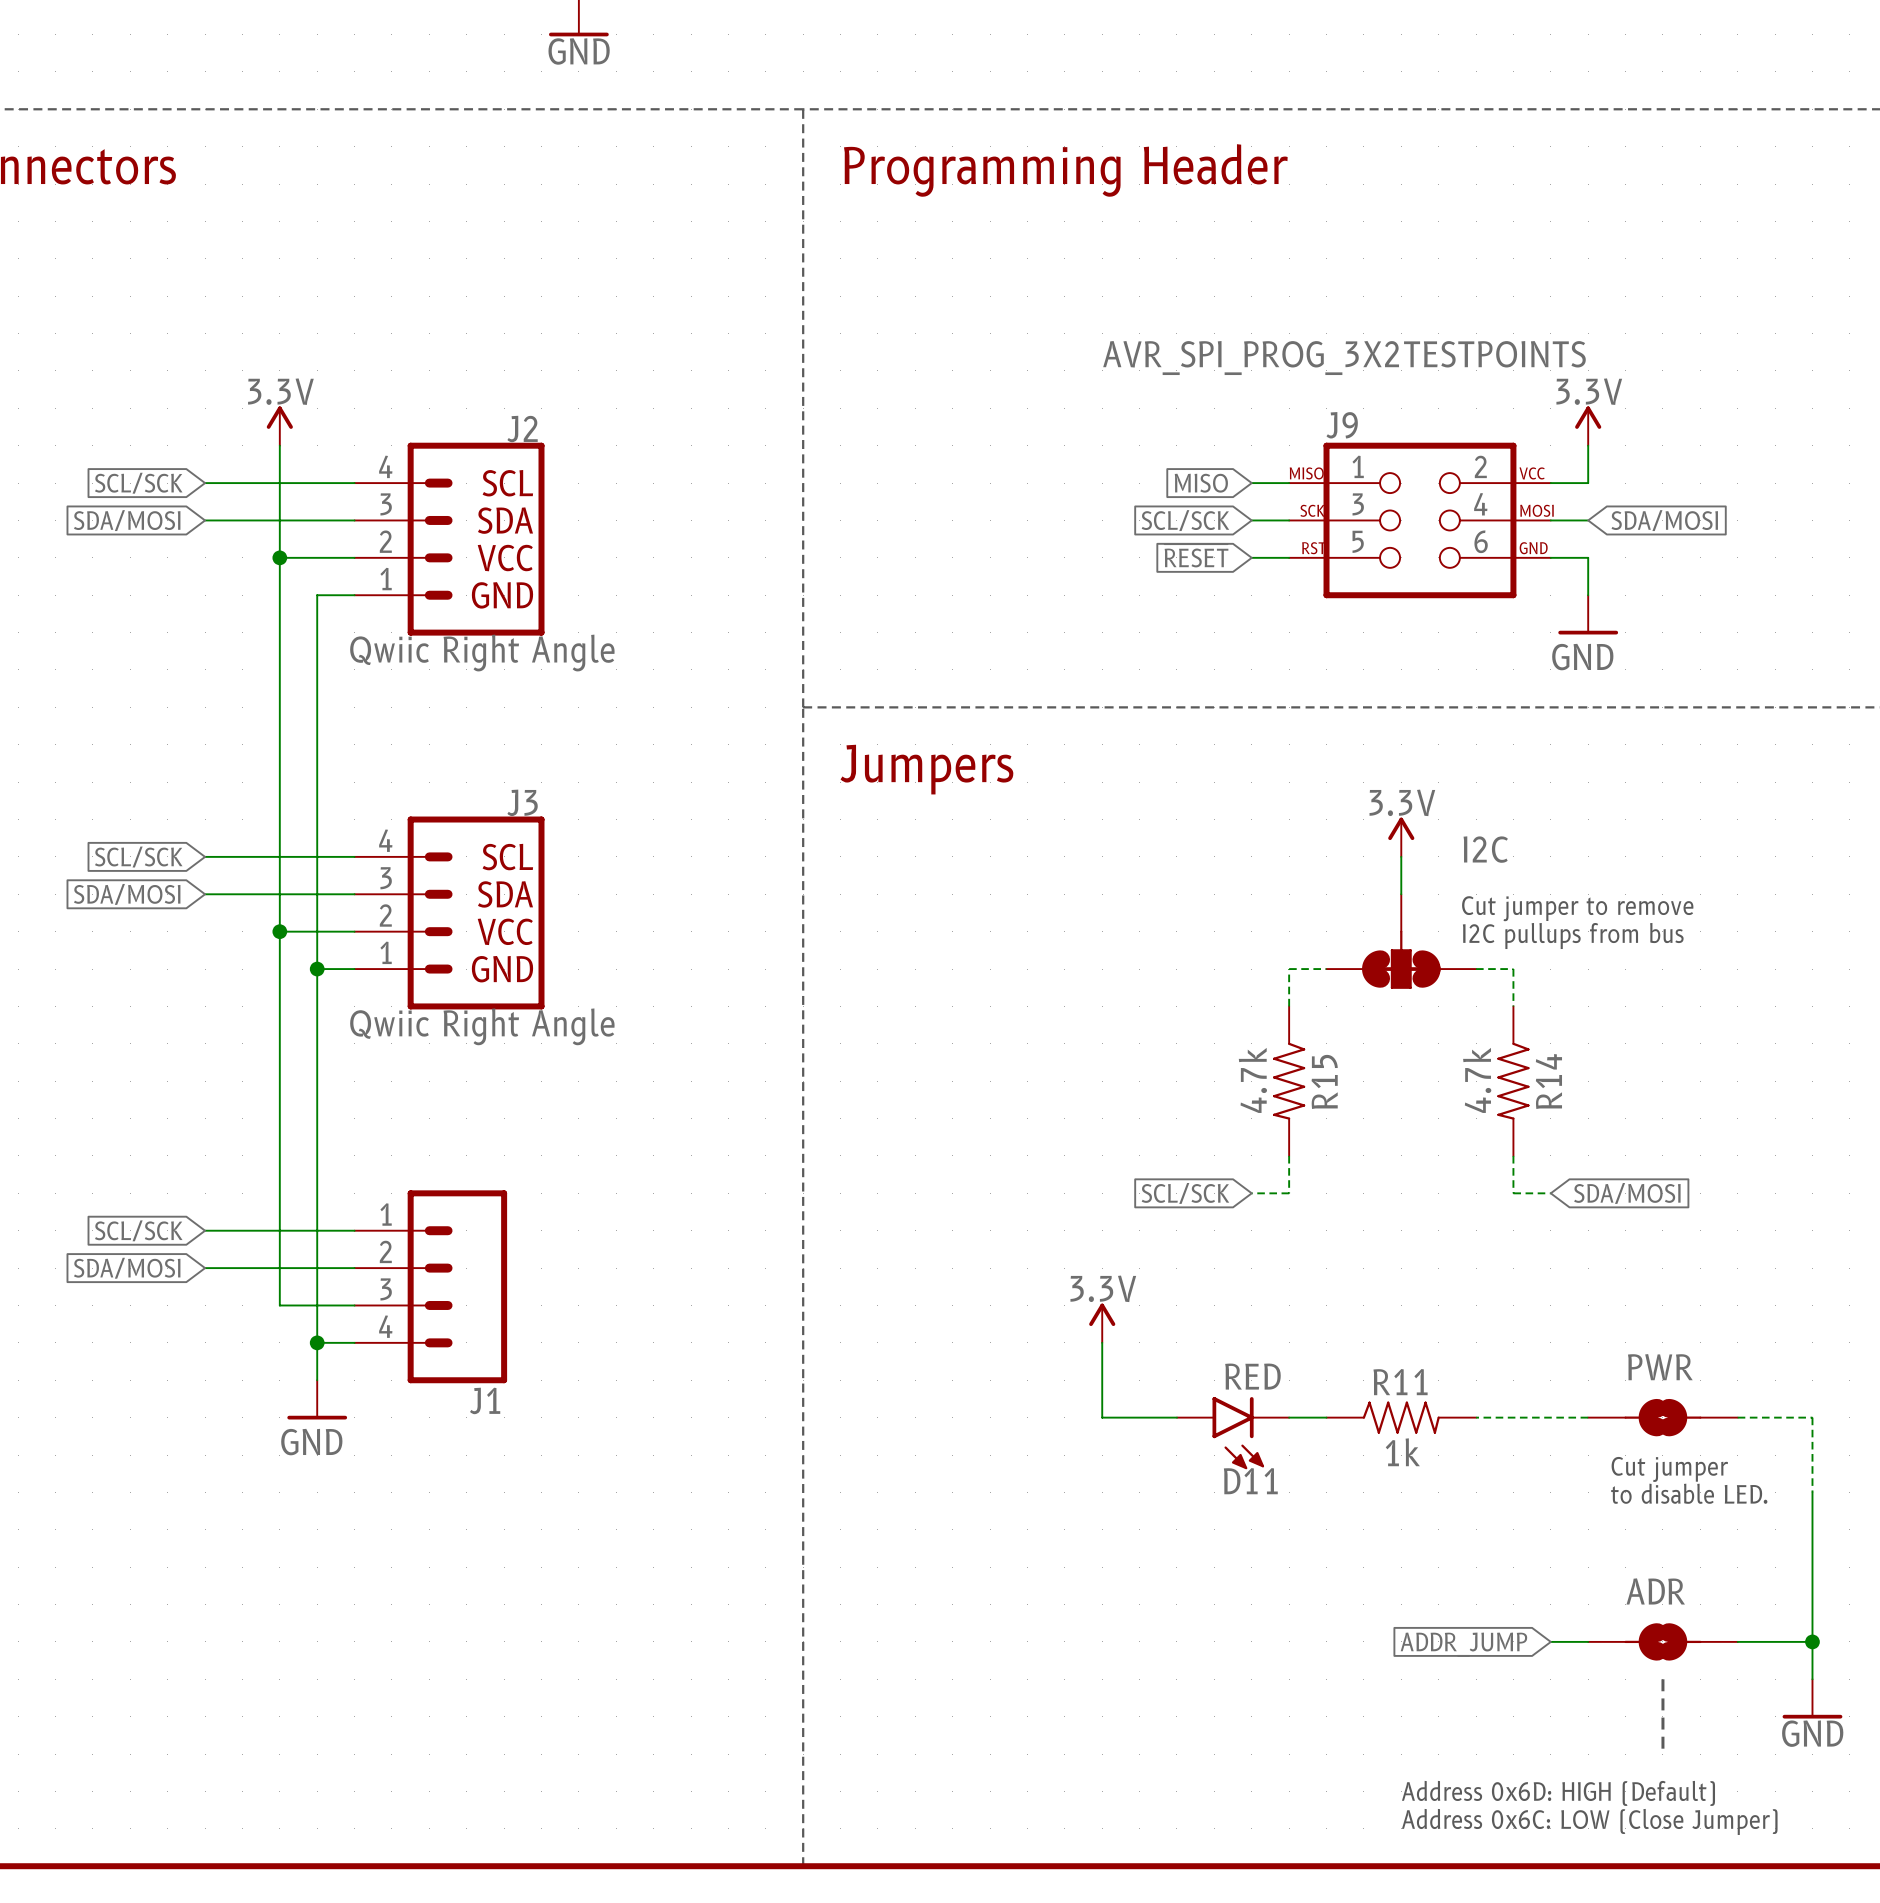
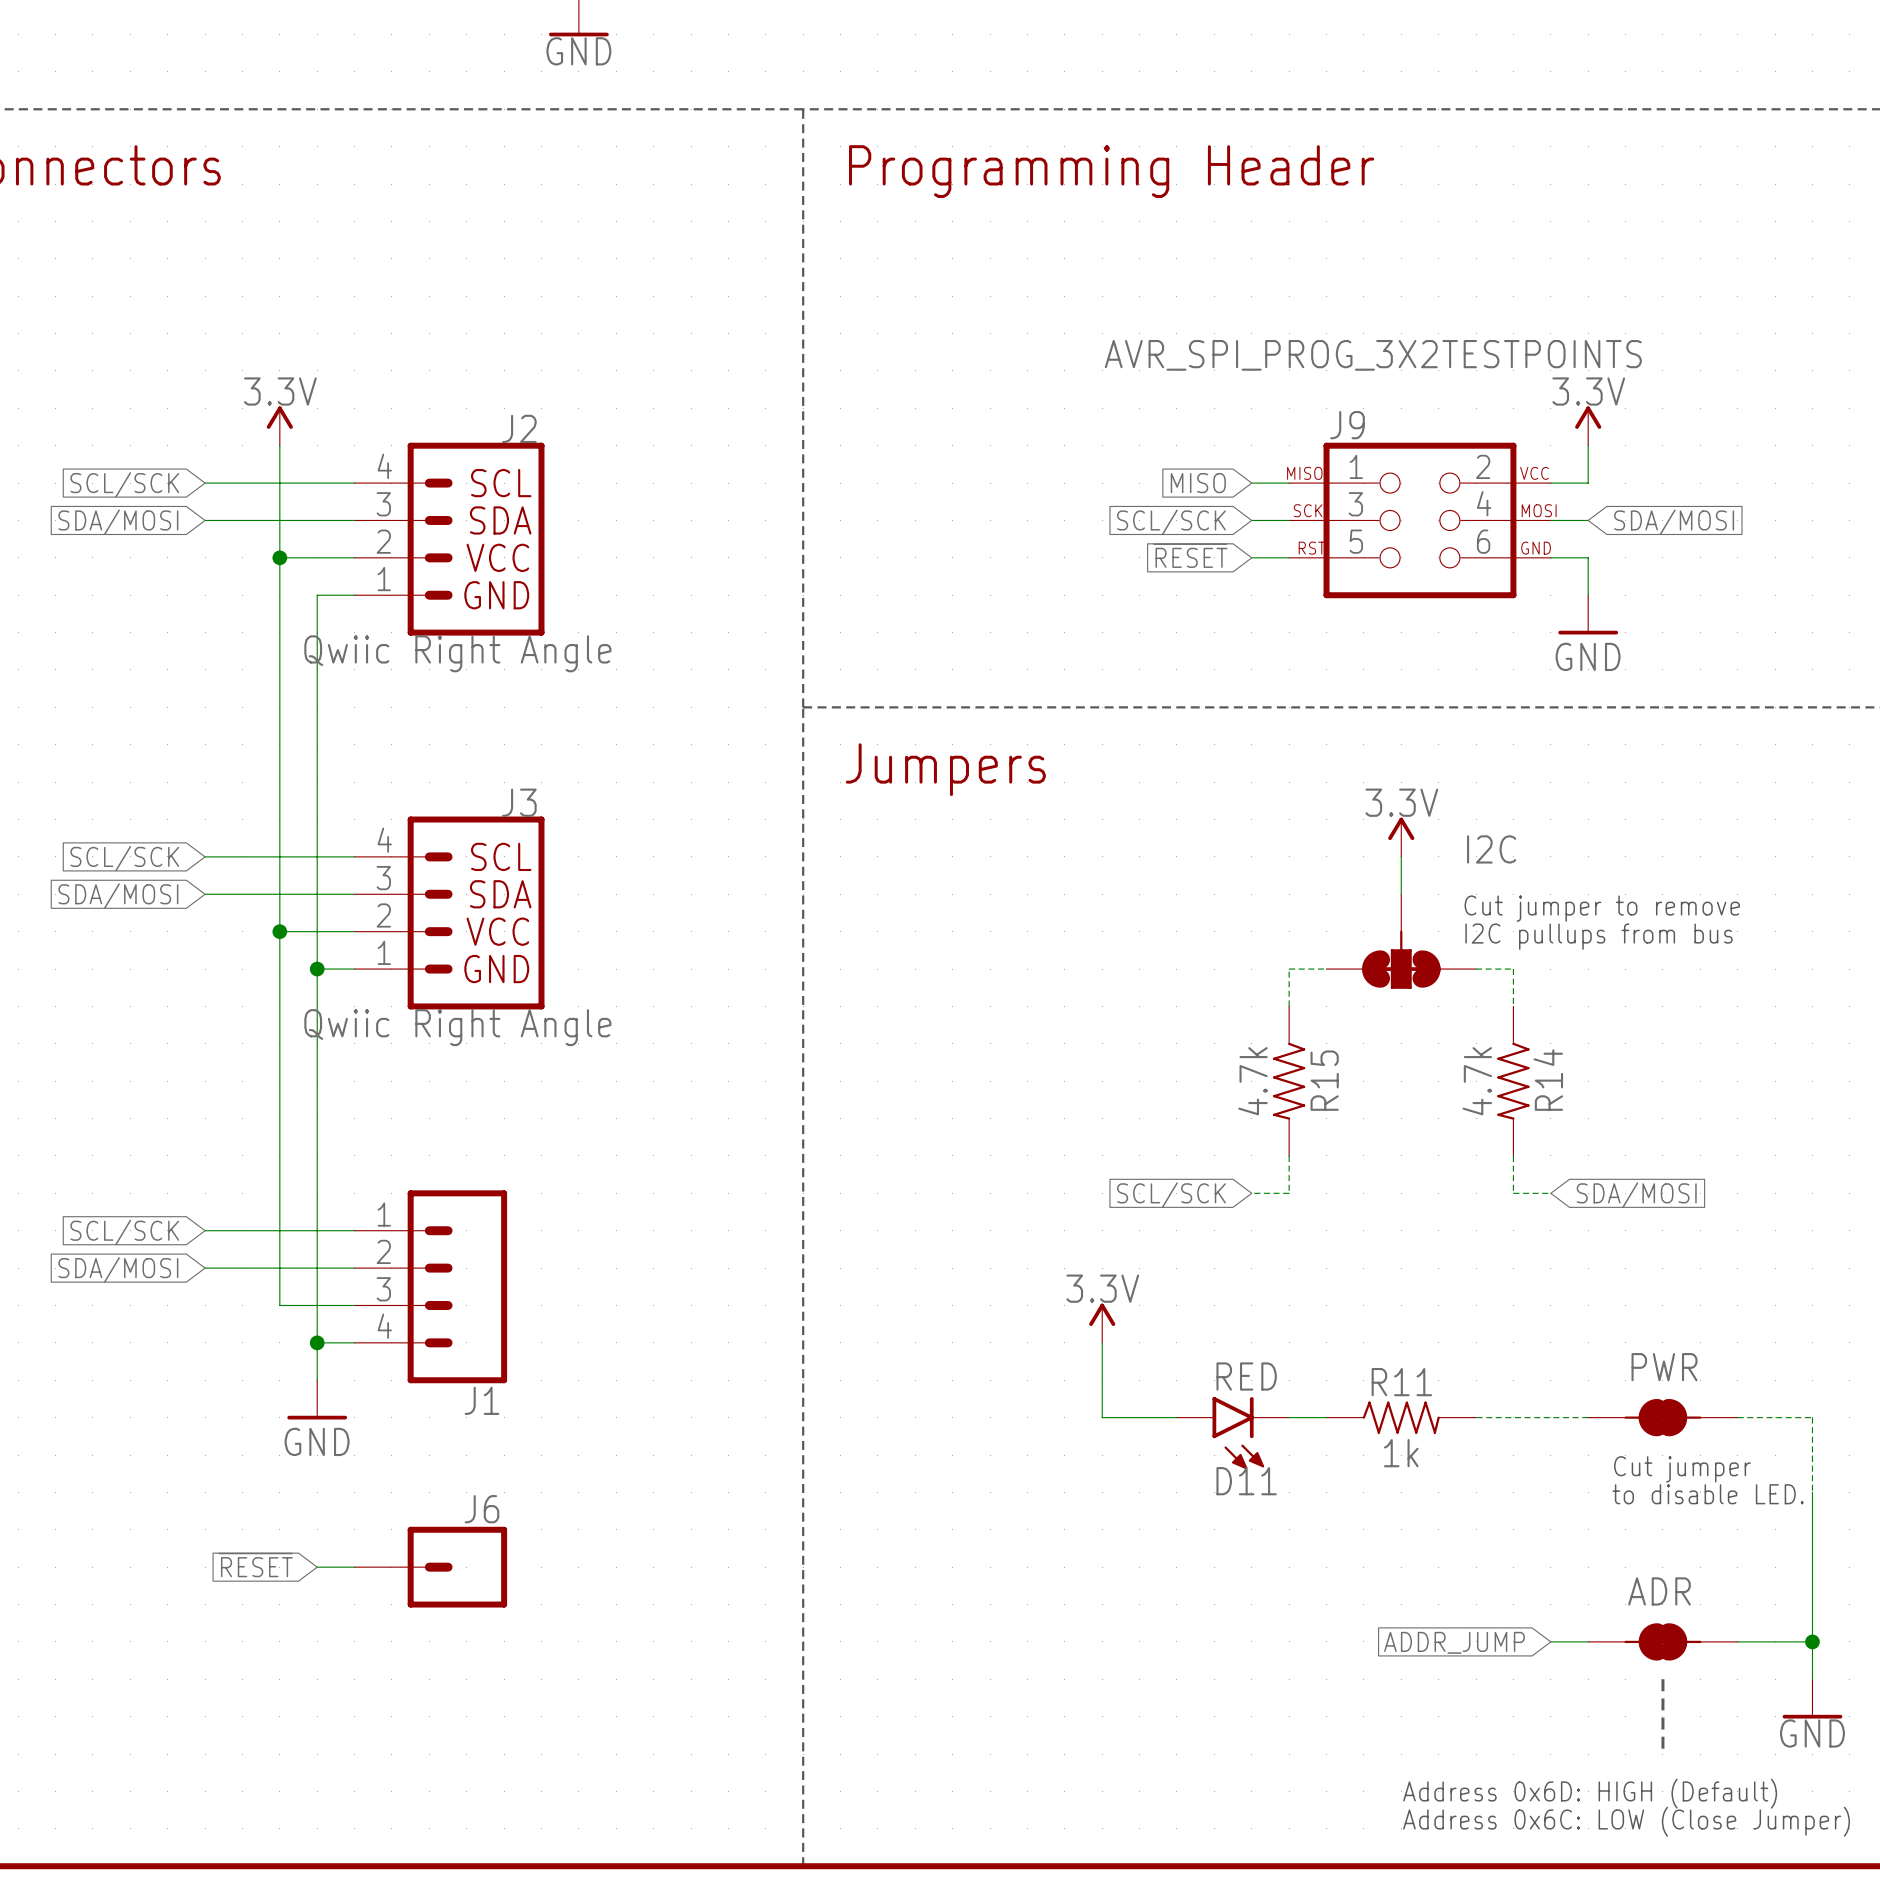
PWR symbol: [1588, 1398, 1738, 1437] -> [1588, 1398, 1738, 1437]
global label: none -> ~{RESET} (255, 1565)
wire: none -> (317, 1567) (354, 1567)
J6: none -> (430, 1567)
ADR symbol: [1588, 1623, 1738, 1661] -> [1588, 1623, 1738, 1661]

